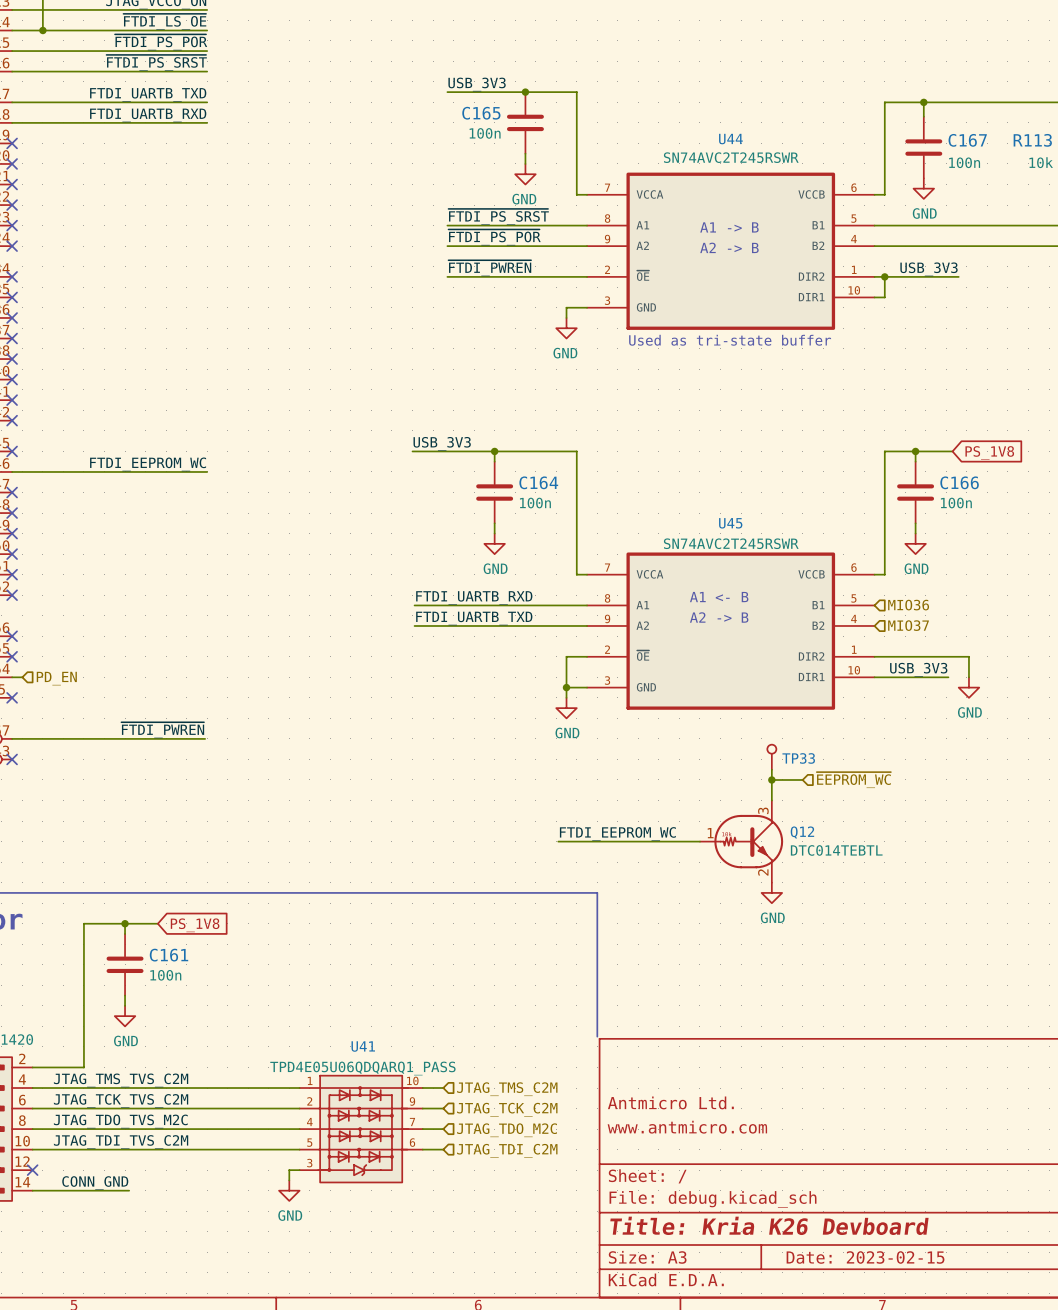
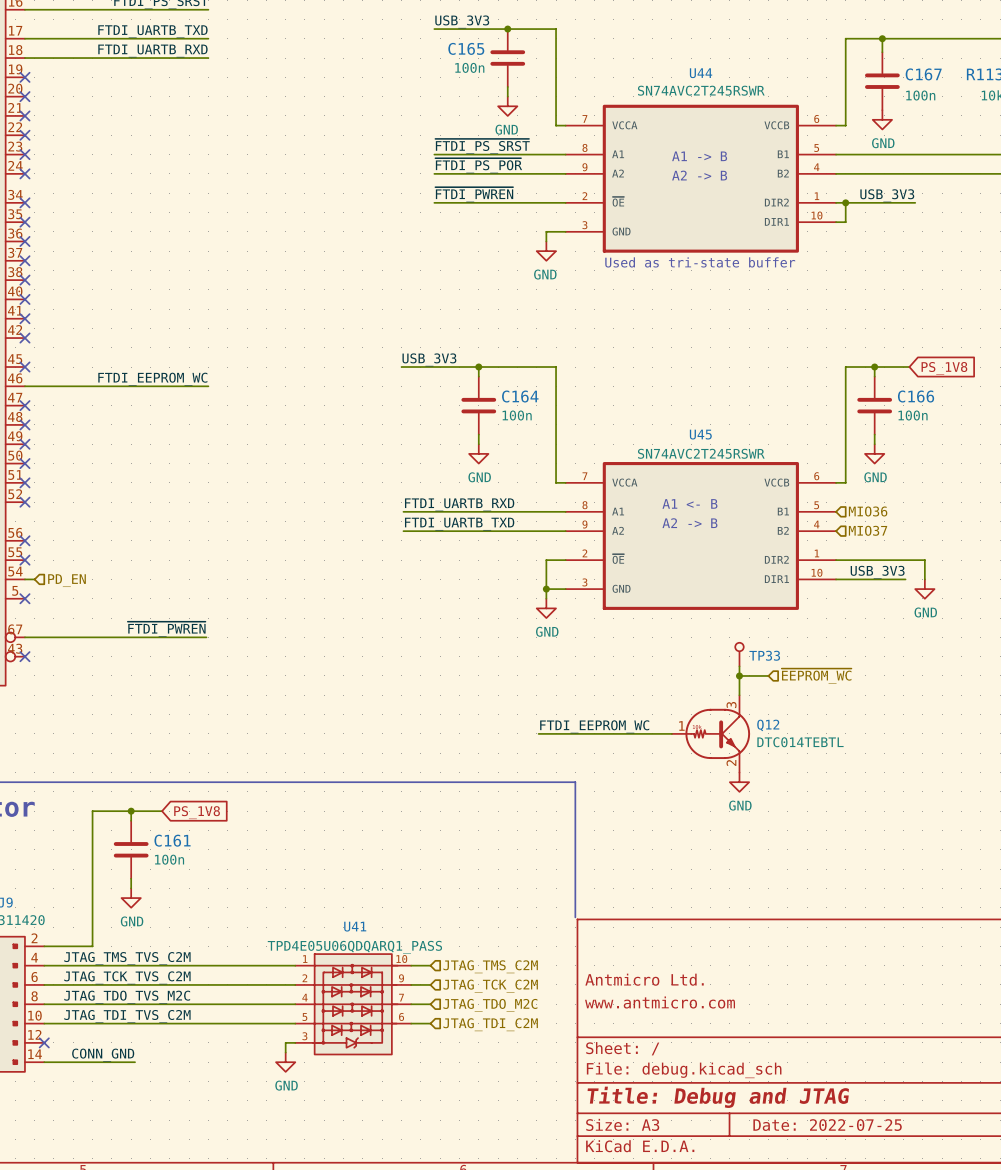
title block: Title: Kria K26 Devboard (769, 1225) -> Title: Debug and JTAG (718, 1097)
title block: Date: 2023-02-15 (865, 1257) -> Date: 2022-07-25 (827, 1125)

